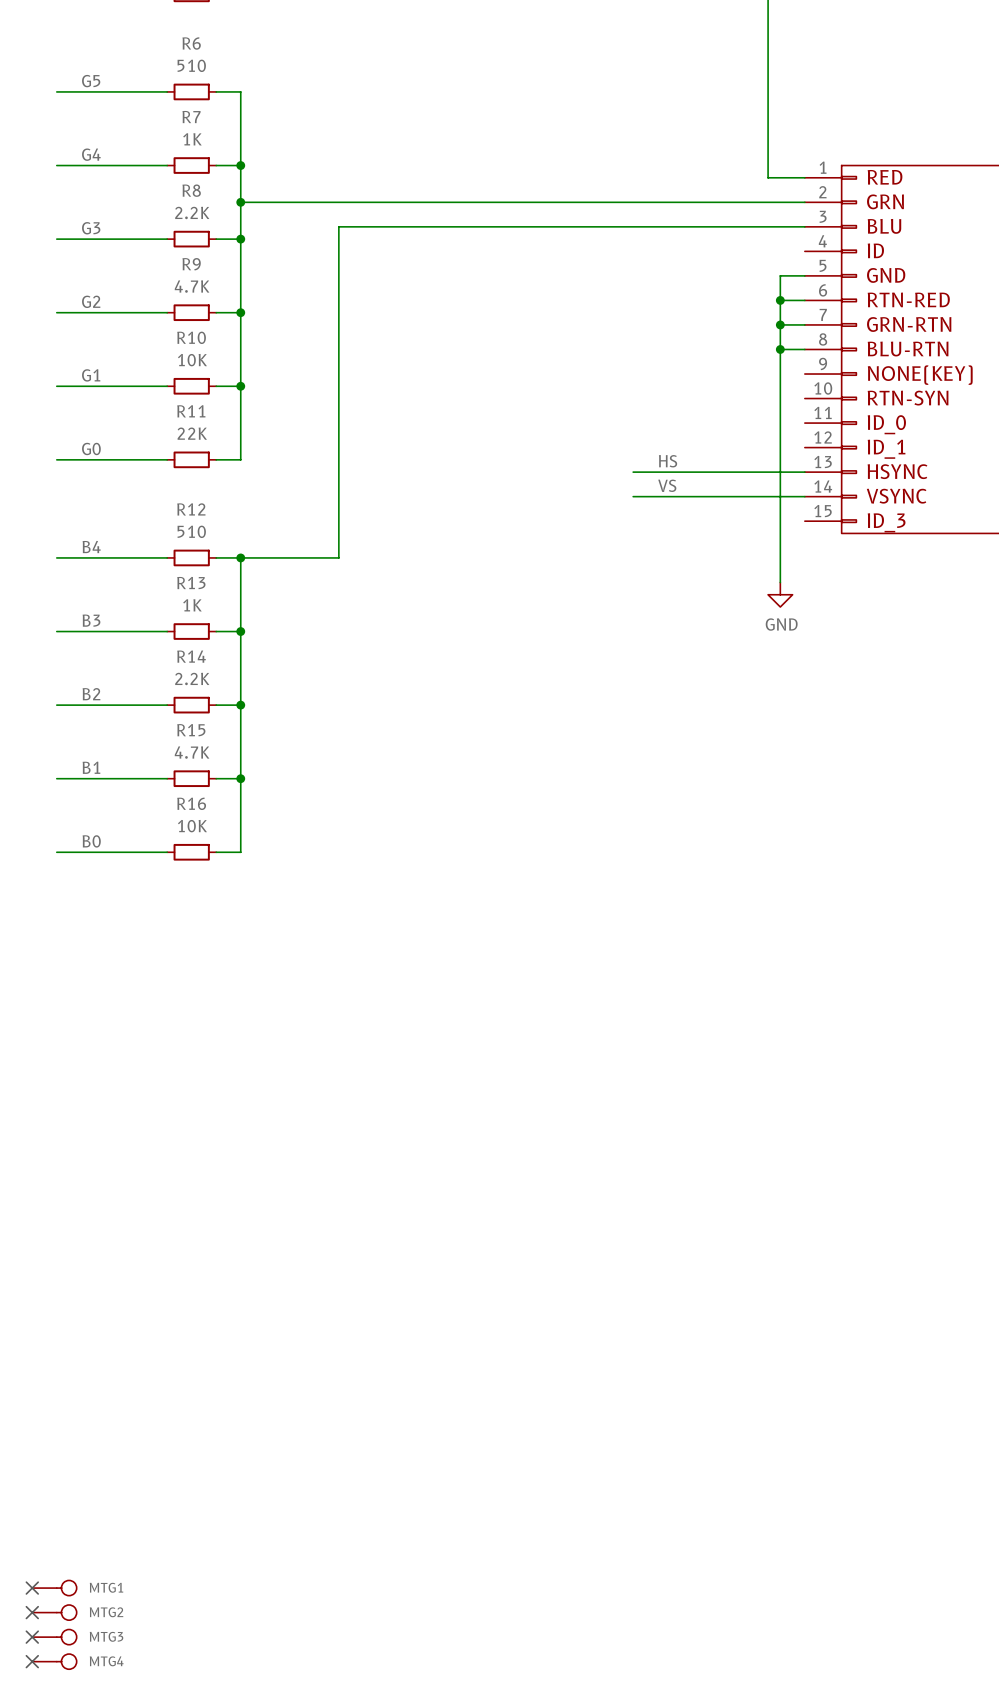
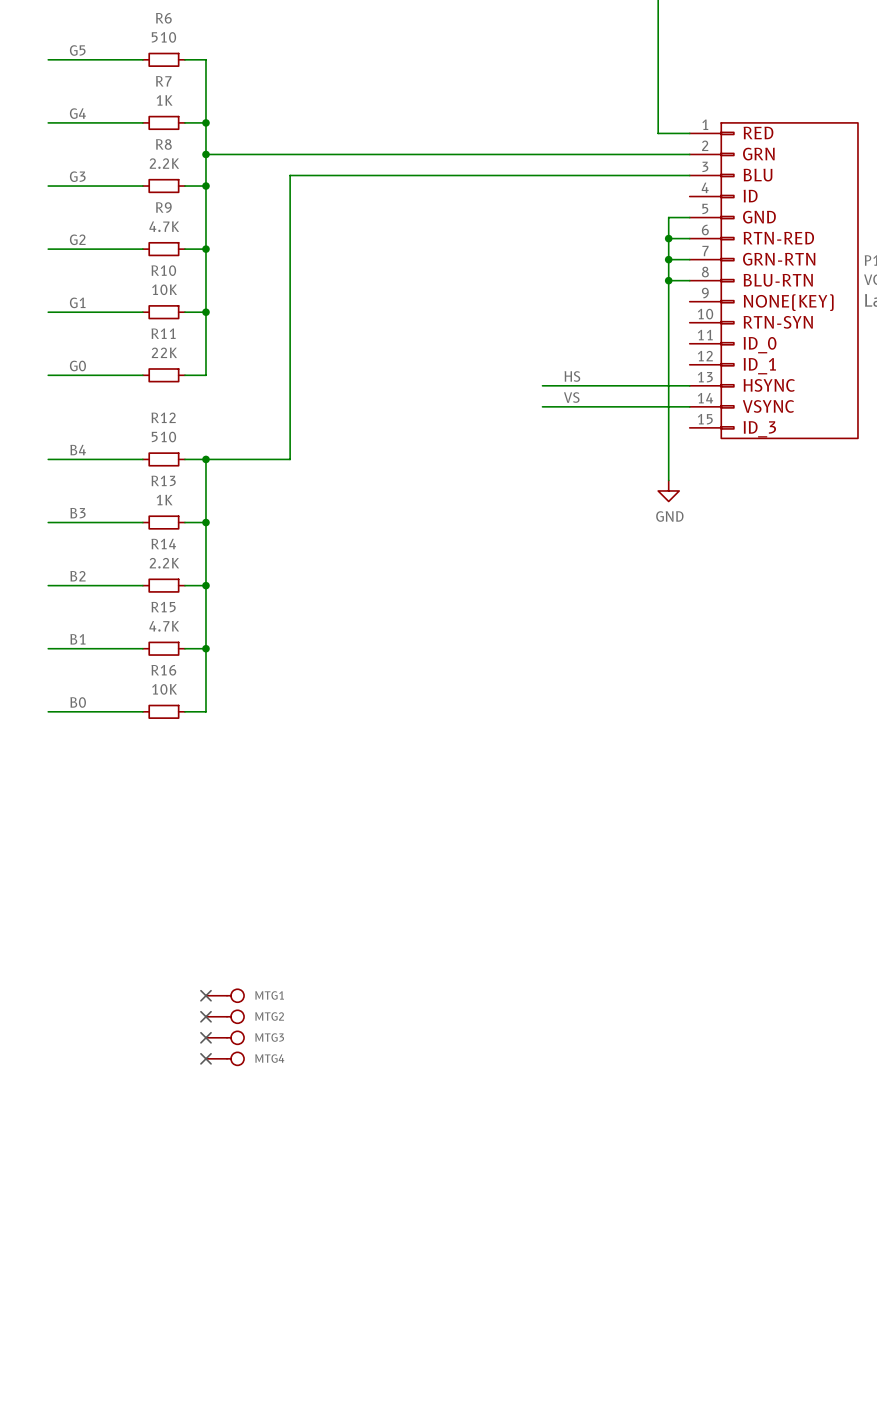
no-connect mark: none -> (205, 995)
no-connect mark: none -> (205, 1016)
no-connect mark: none -> (205, 1037)
no-connect mark: none -> (205, 1058)
no-connect mark: (32, 1588) -> none
MTG1 position: (54, 1588) -> (225, 995)
no-connect mark: (32, 1612) -> none
MTG2 position: (54, 1612) -> (225, 1016)
no-connect mark: (32, 1637) -> none
MTG3 position: (54, 1637) -> (225, 1037)
no-connect mark: (32, 1661) -> none
MTG4 position: (54, 1661) -> (225, 1058)

